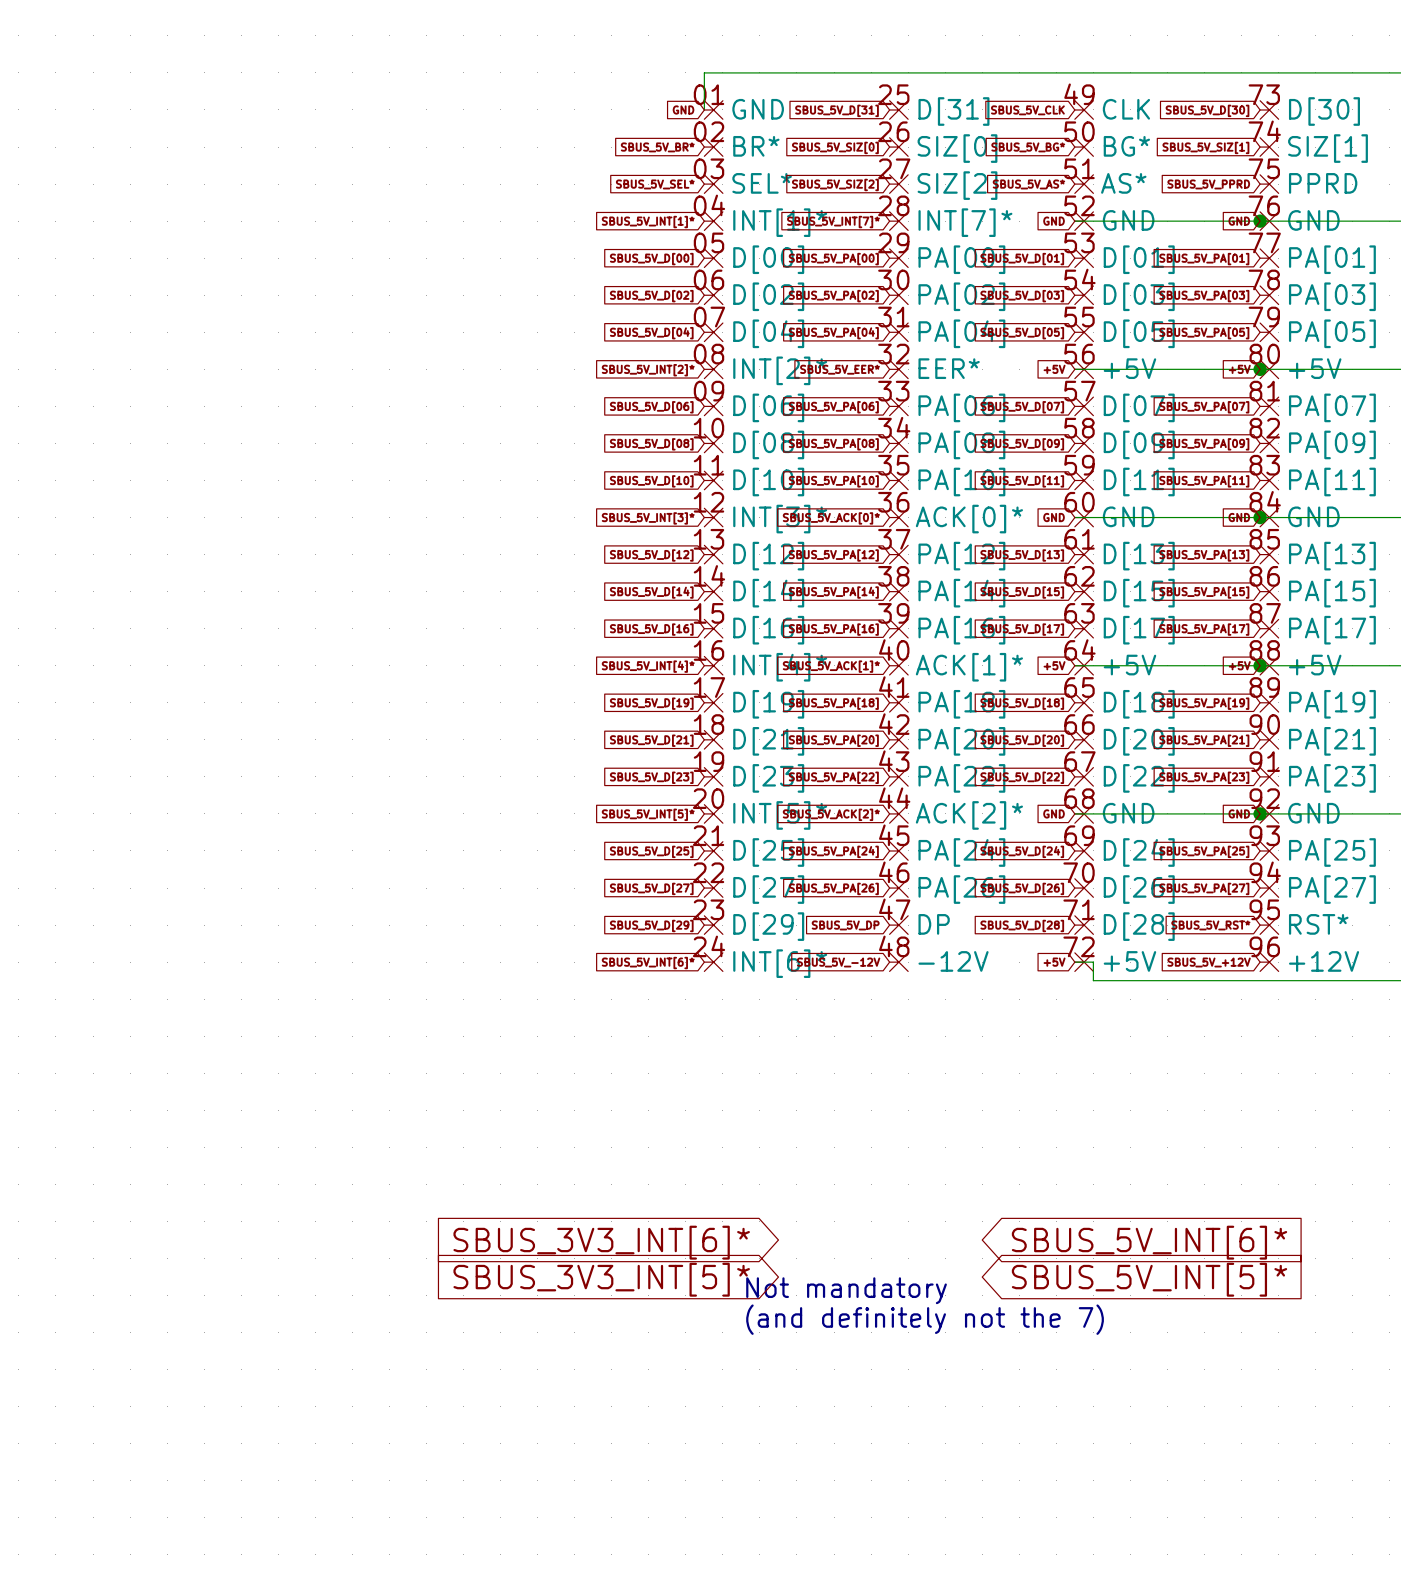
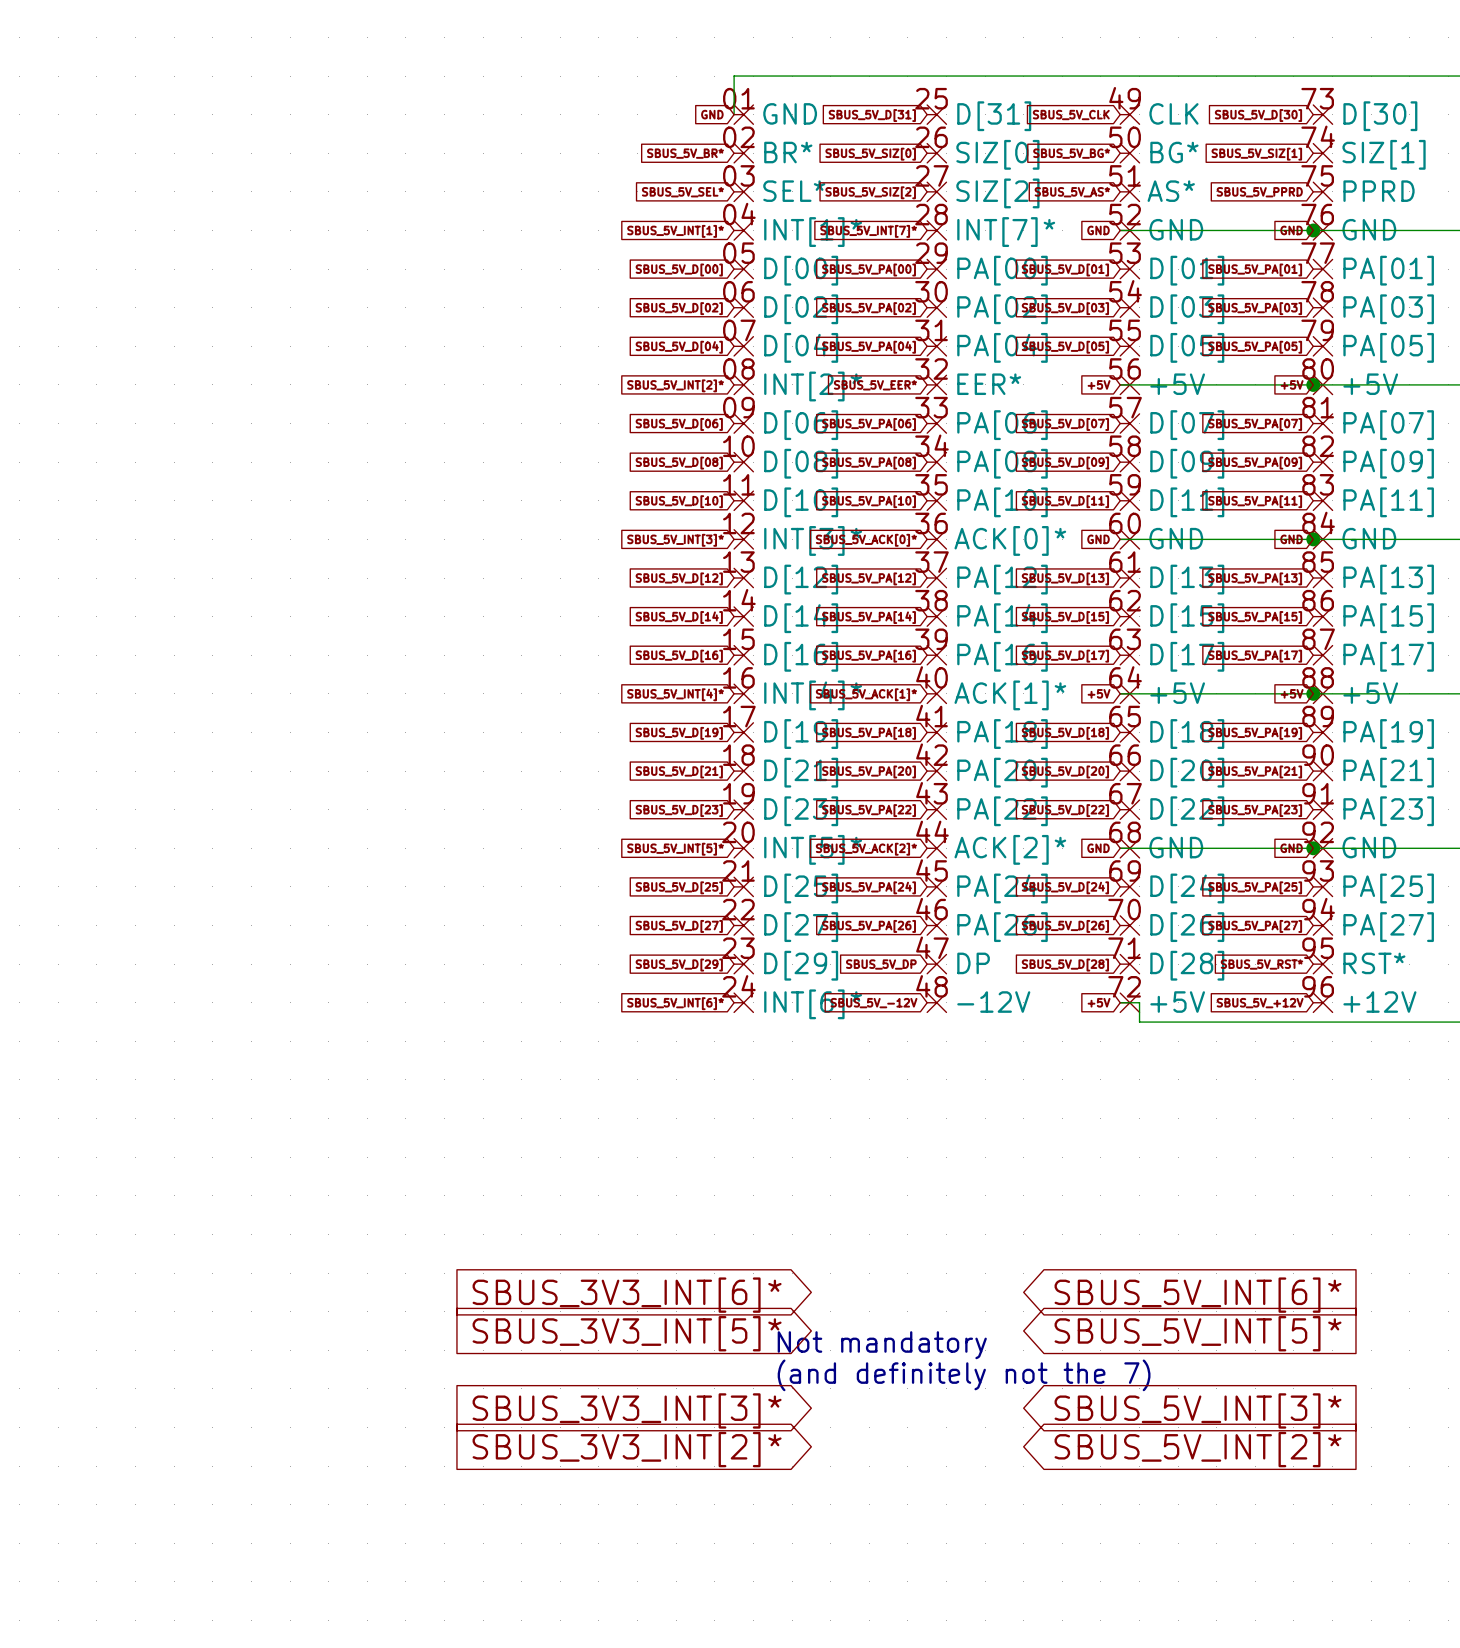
global label: none -> SBUS_3V3_INT[3]* (627, 1410)
global label: none -> SBUS_5V_INT[3]* (1198, 1410)
global label: none -> SBUS_3V3_INT[2]* (627, 1449)
global label: none -> SBUS_5V_INT[2]* (1198, 1449)

